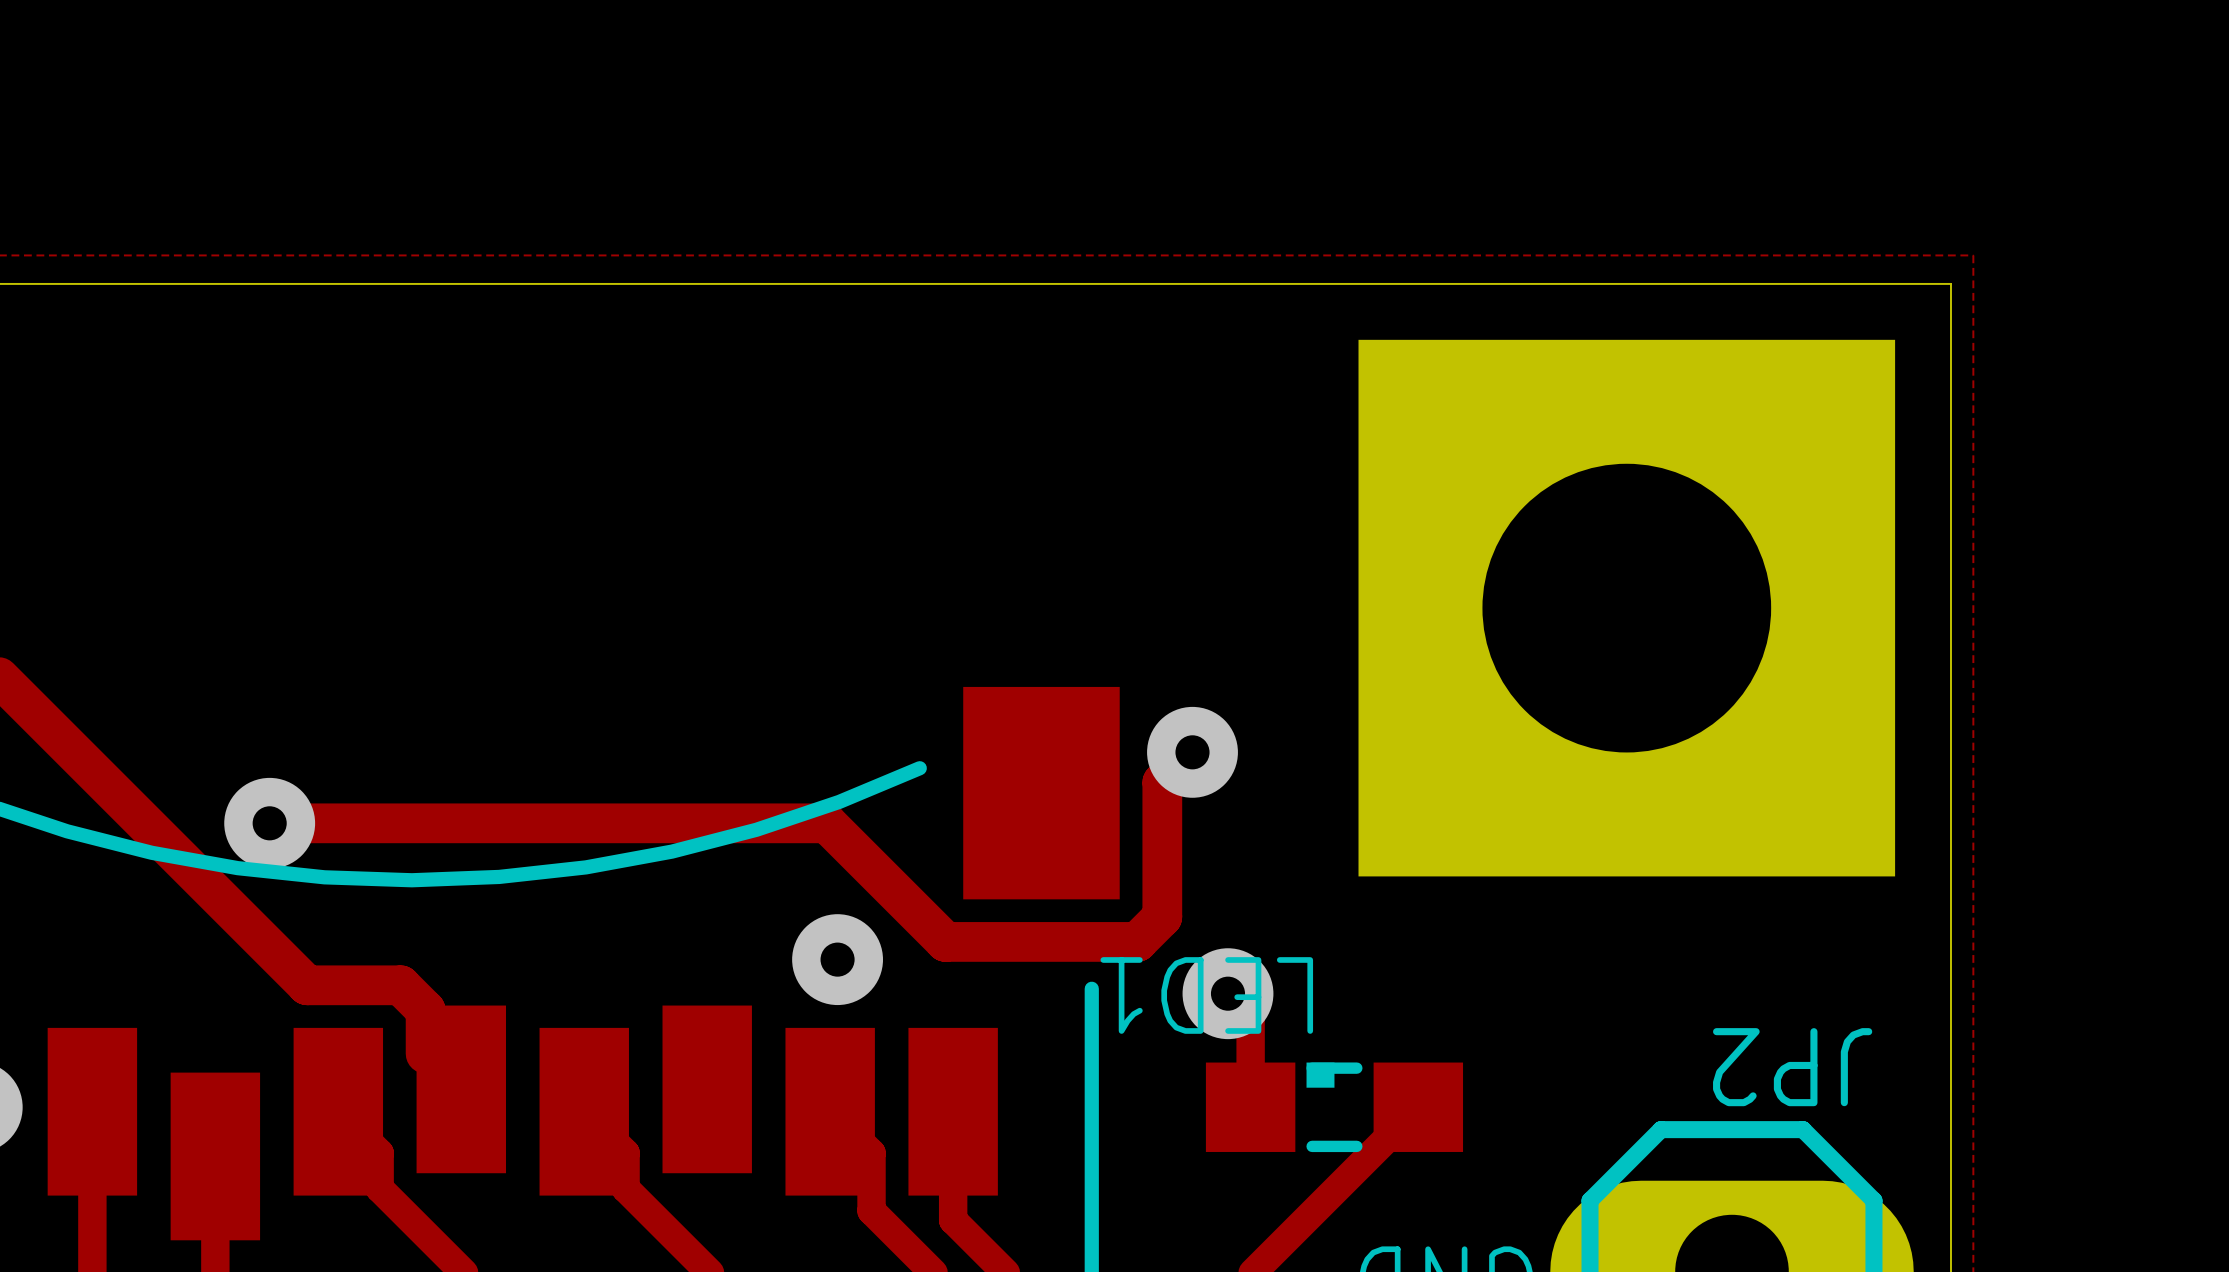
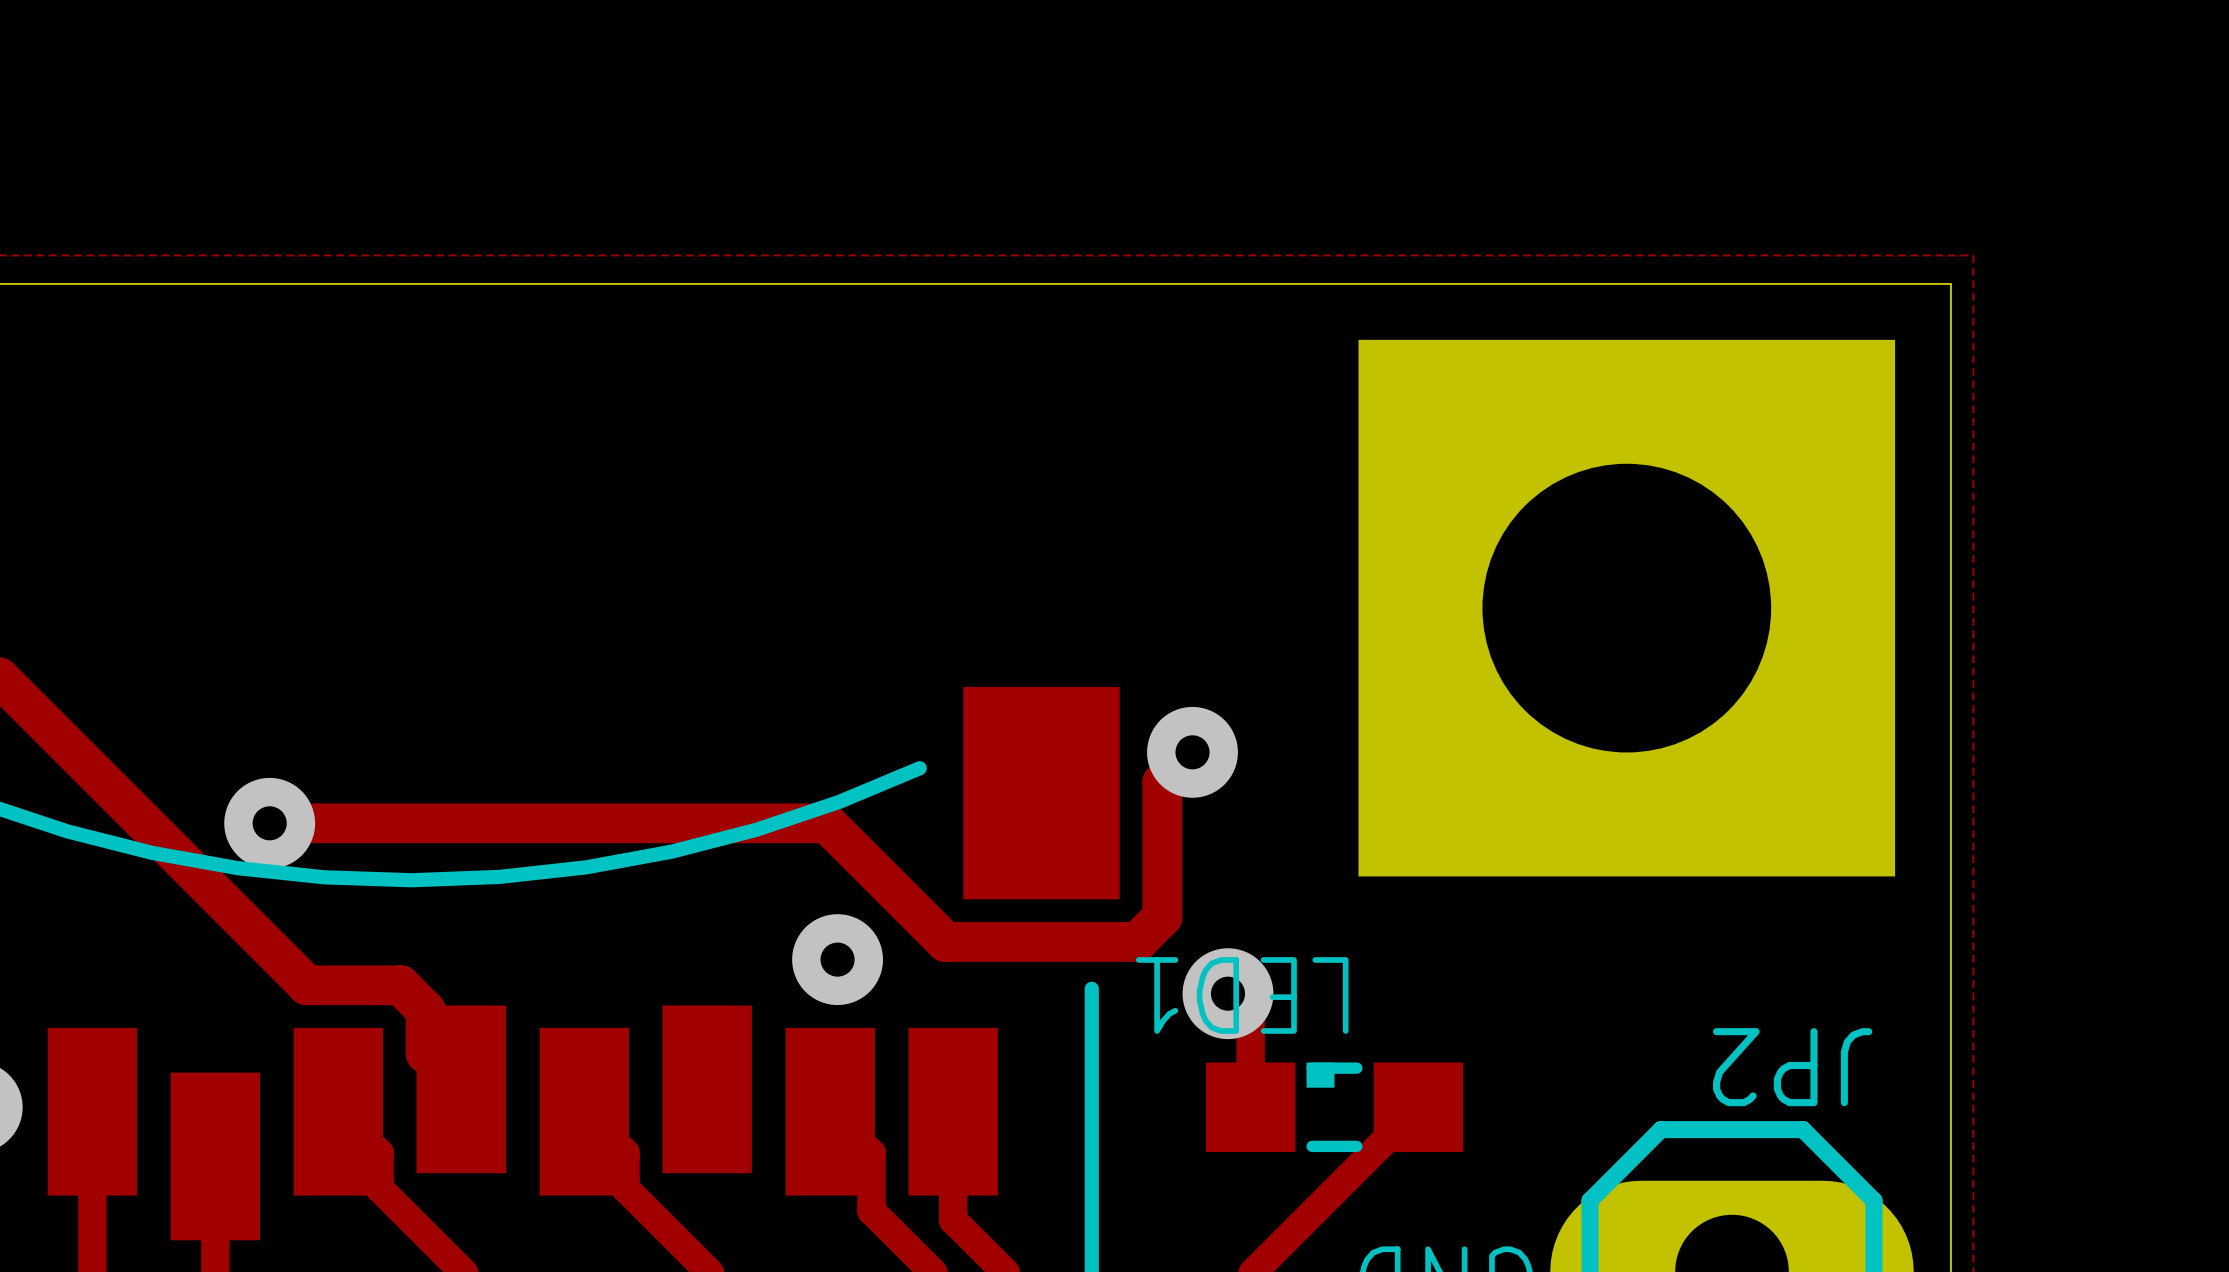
LED1 name position: LED1 (1206, 995) -> LED1 (1242, 995)

